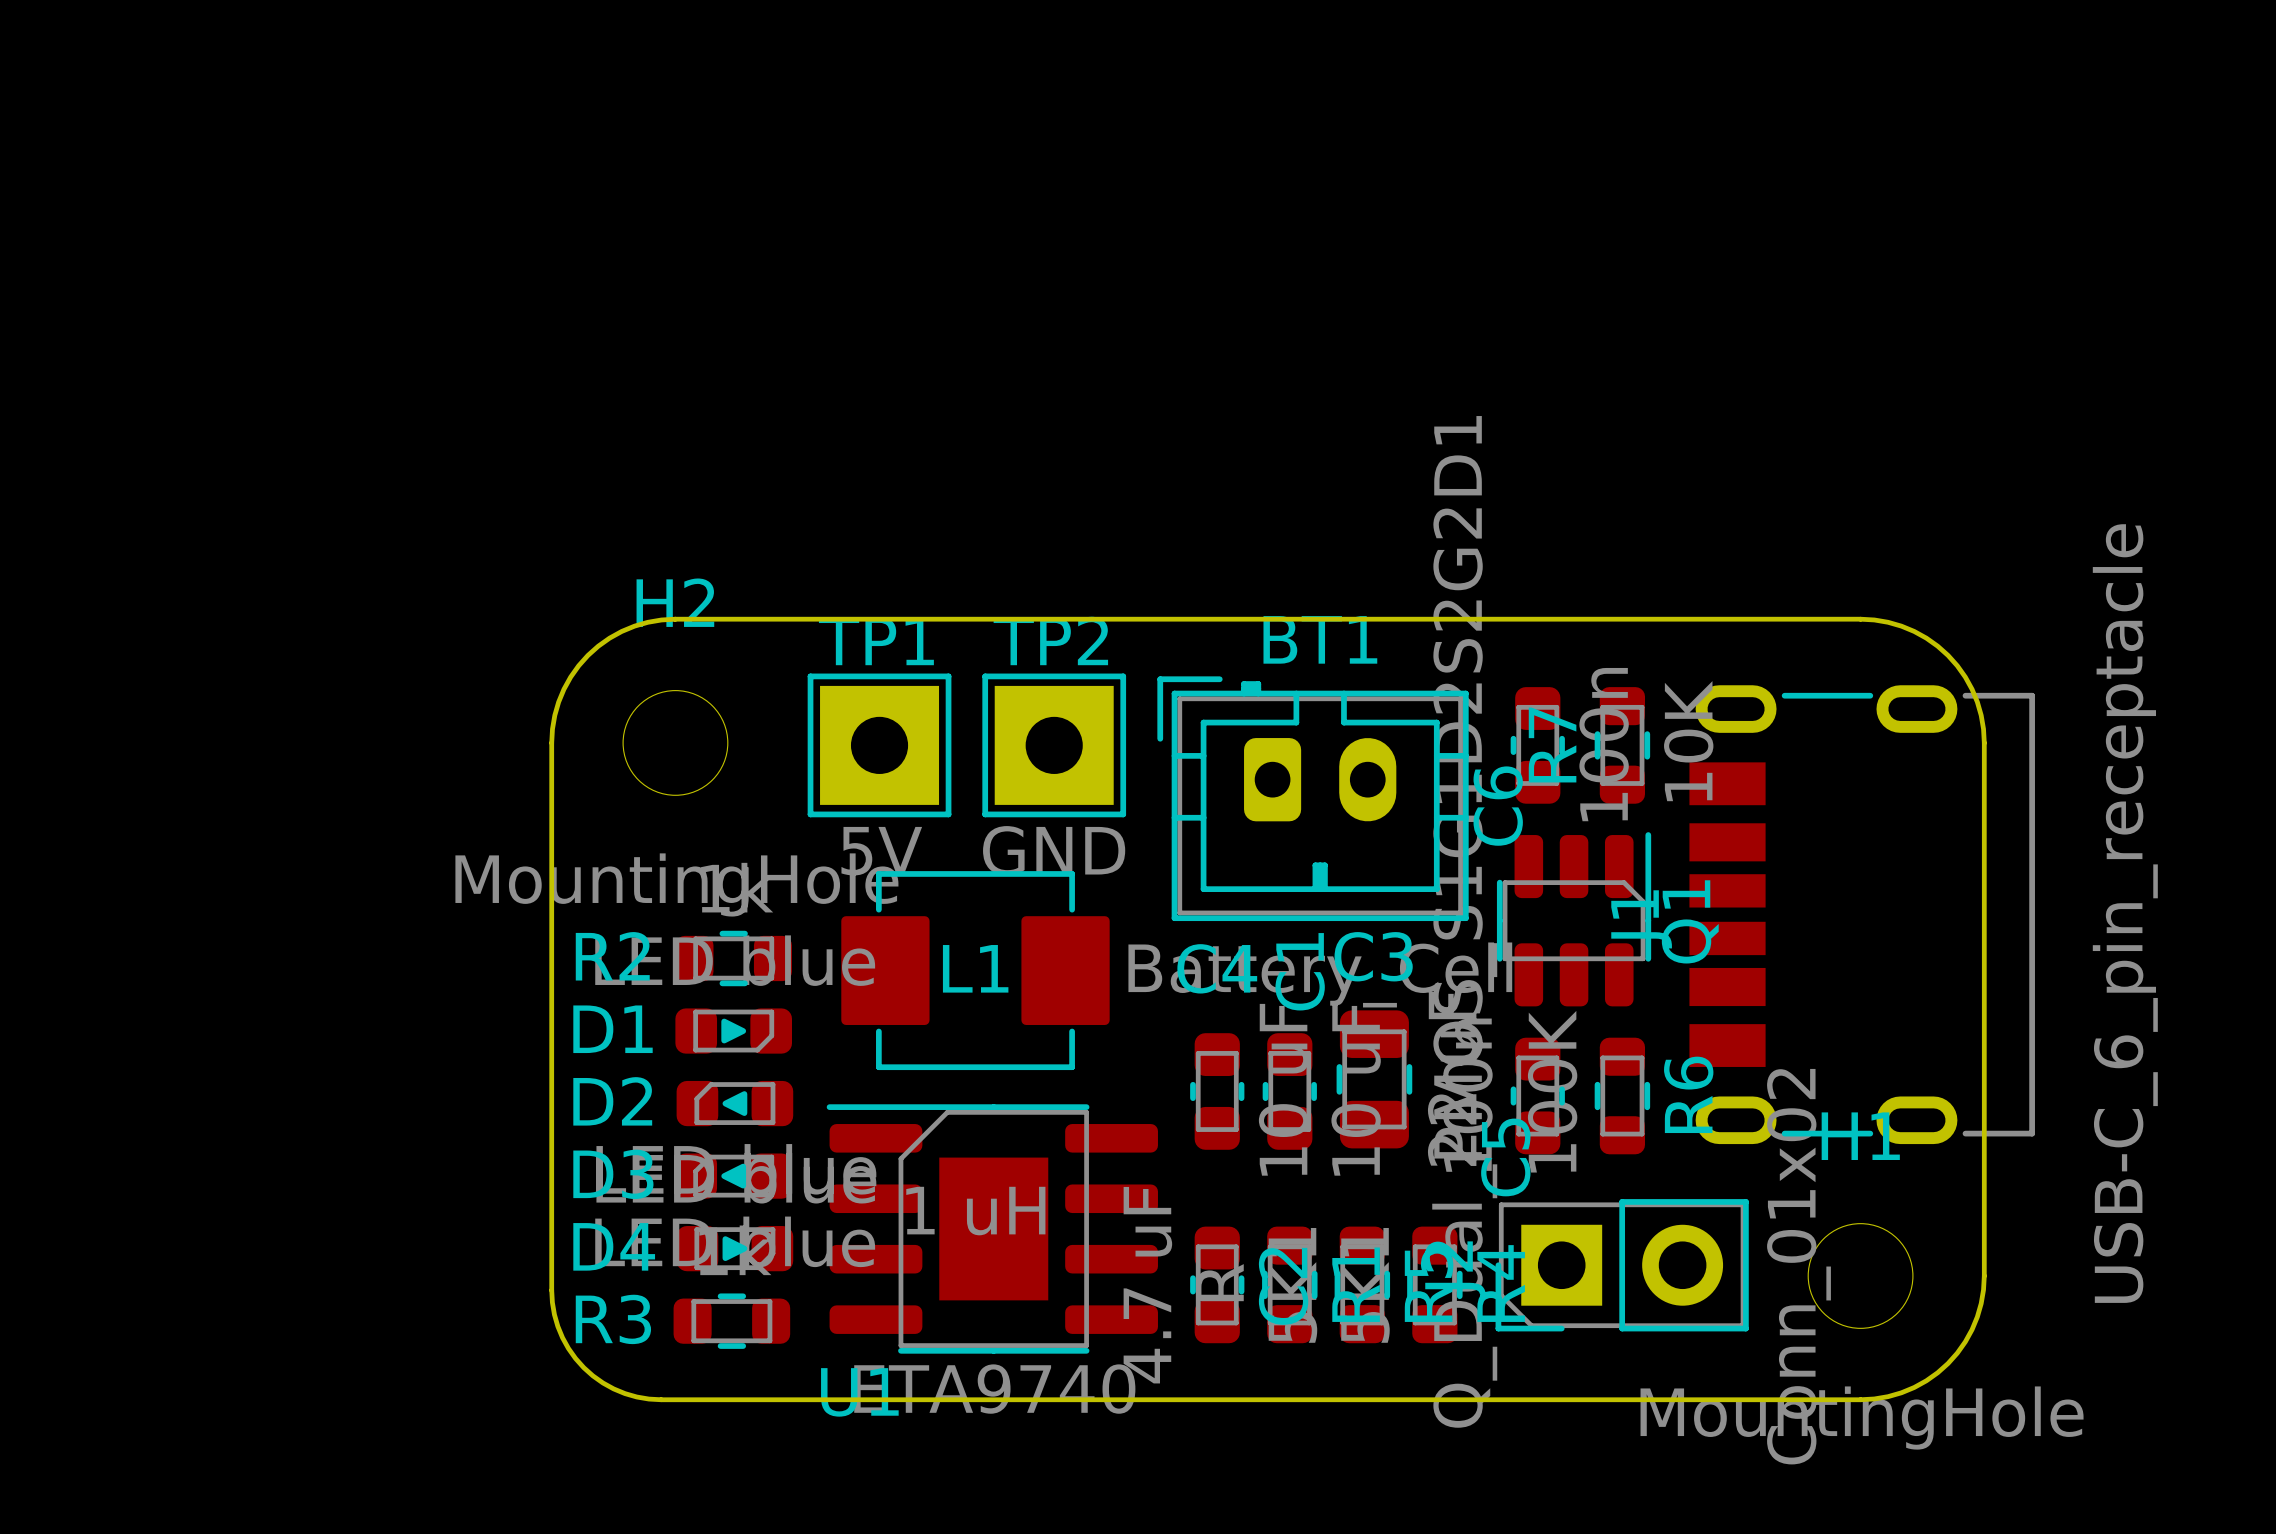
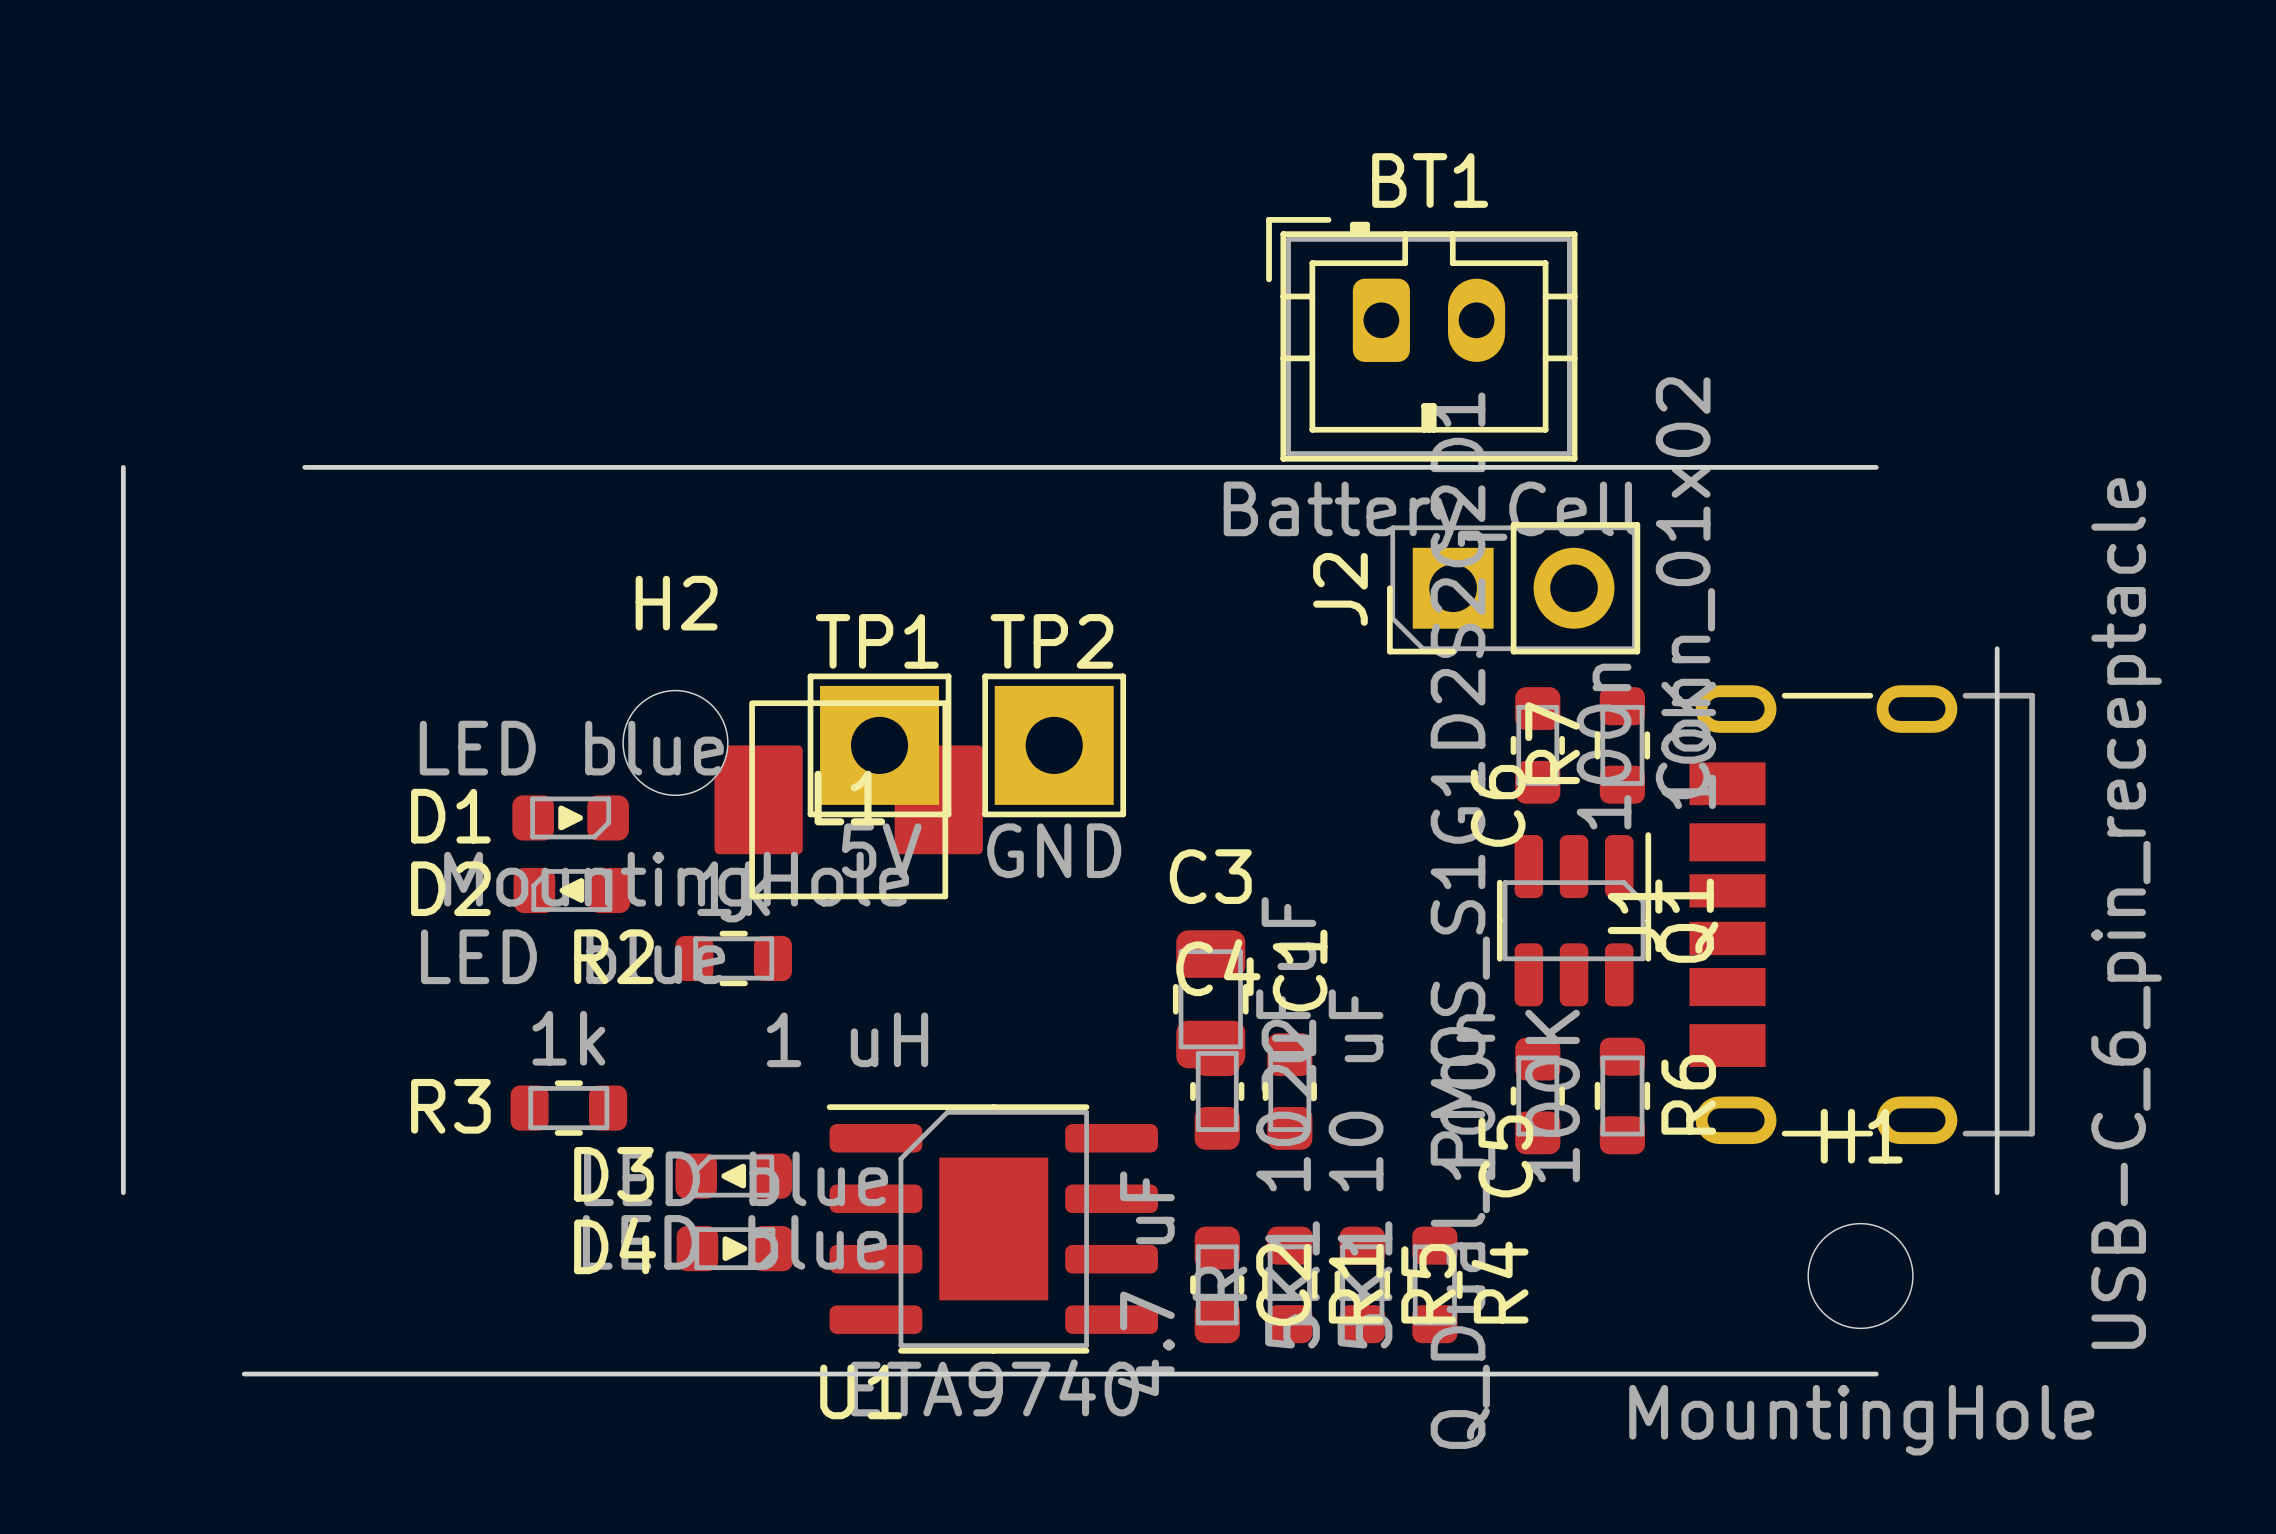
board edge: none -> (123, 467) (123, 1192)
board edge: none -> (304, 467) (1876, 467)
board edge: (674, 619) (1860, 619) (1888, 622) (1914, 631) (1926, 638) (1948, 655) (1965, 677) (1972, 689) (1981, 715) (1984, 742) (1984, 1276) (1981, 1303) (1977, 1316) (1965, 1341) (1948, 1363) (1926, 1380) (1901, 1392) (1888, 1396) (1860, 1399) (661, 1399) (625, 1393) (602, 1382) (583, 1367) (568, 1348) (557, 1326) (552, 1302) (552, 729) (558, 702) (570, 677) (587, 655) (598, 646) (621, 631) (634, 626) (661, 619) (675, 619) -> none
board edge: none -> (1997, 648) (1997, 1192)
BT1 position: (1313, 798) -> (1421, 339)
L1 footprint: [841, 871, 1110, 1071] -> [714, 700, 983, 900]
D1 position: (733, 1031) -> (570, 817)
C3 position: (1374, 1079) -> (1210, 999)
D2 position: (734, 1103) -> (571, 890)
J2 position: (1622, 1265) -> (1513, 588)
R3 position: (731, 1321) -> (568, 1108)
board edge: none -> (244, 1374) (1876, 1374)

